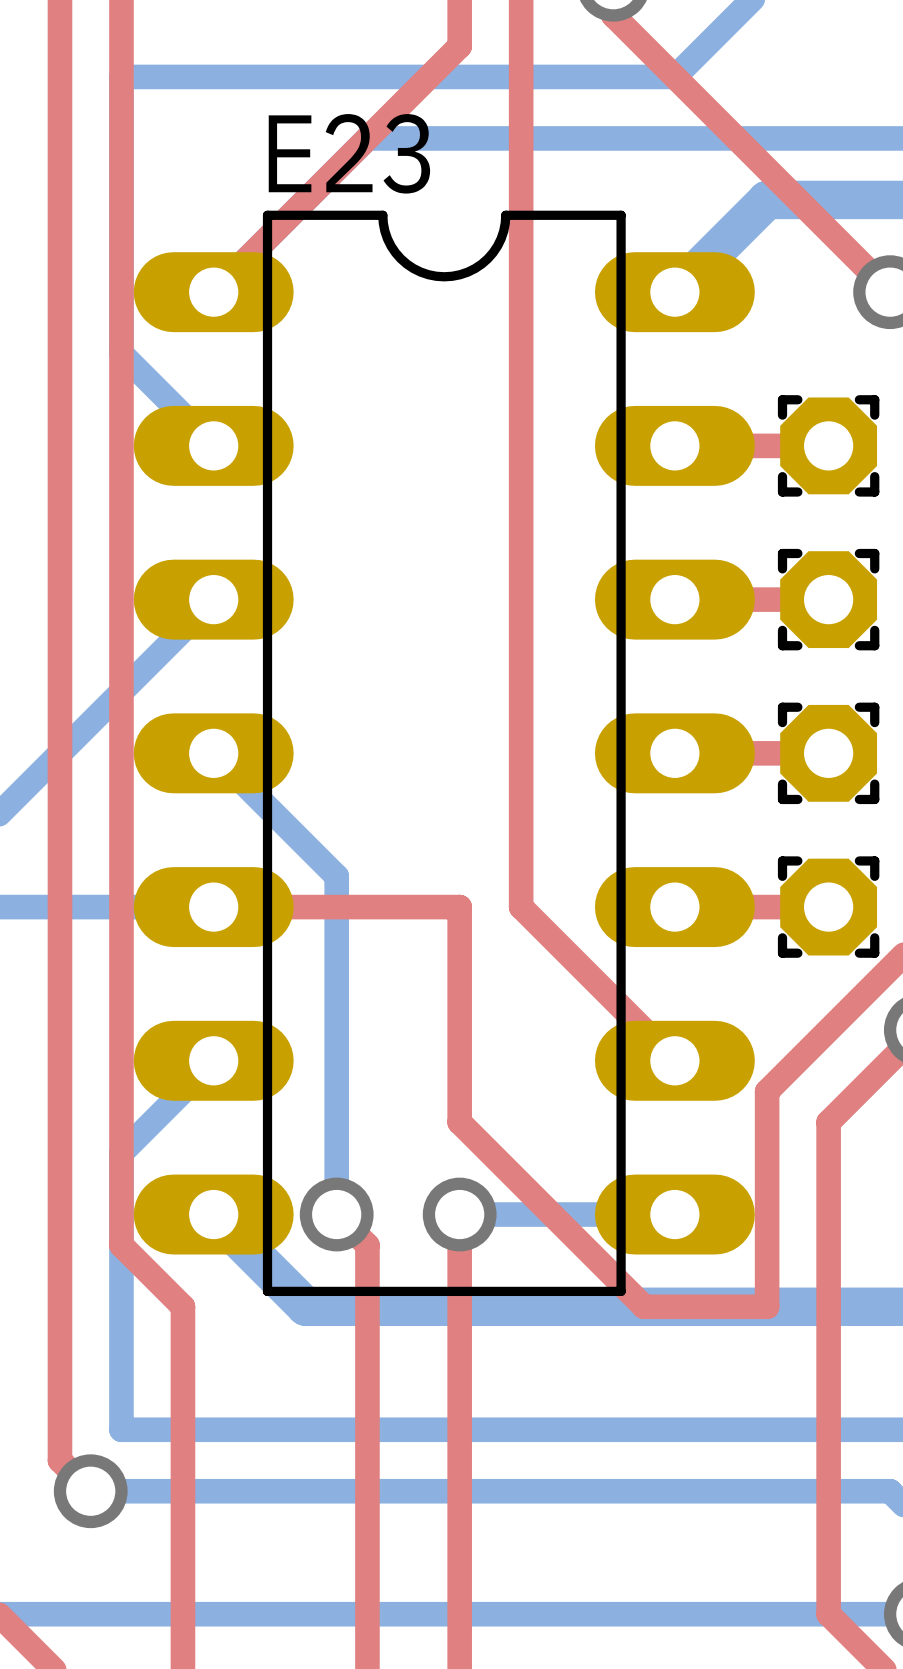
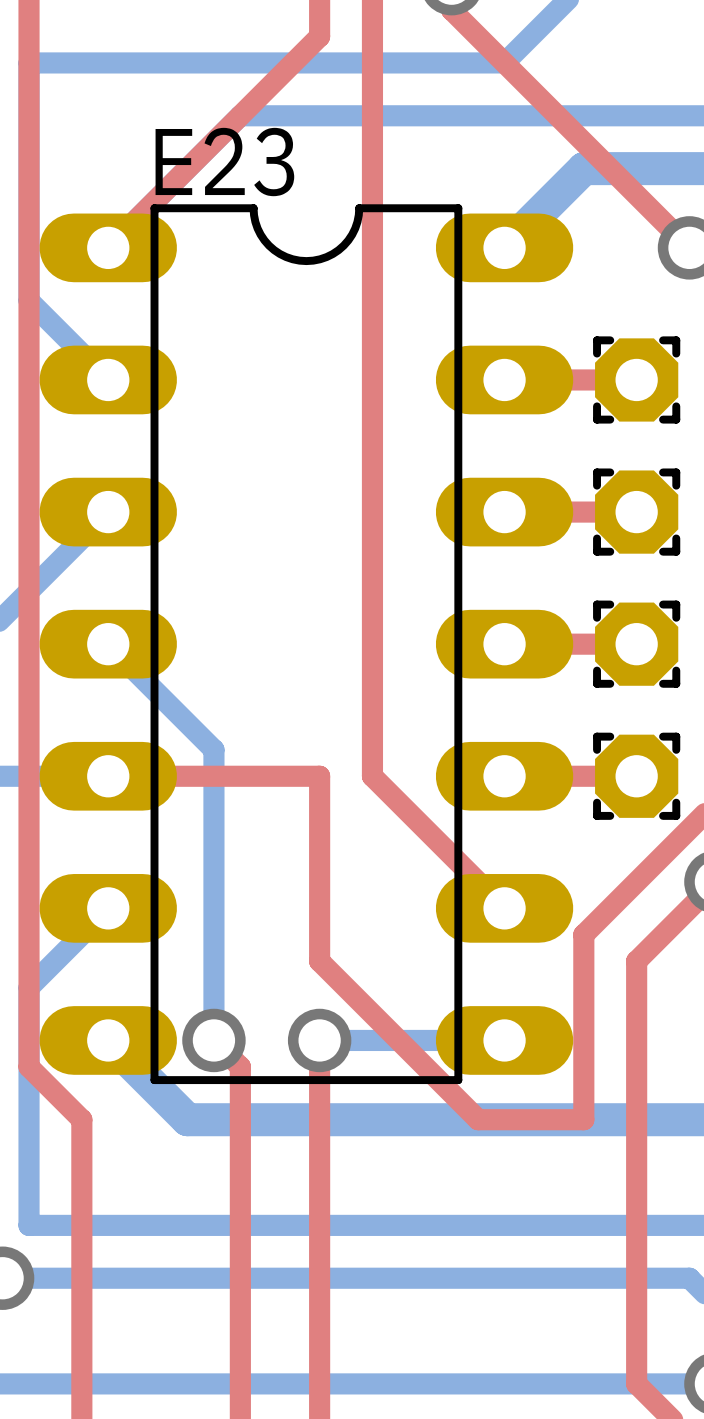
E23 name position: E23 (349, 153) -> E23 (224, 162)
E23 footprint: [133, 210, 755, 1297] -> [39, 204, 574, 1085]

